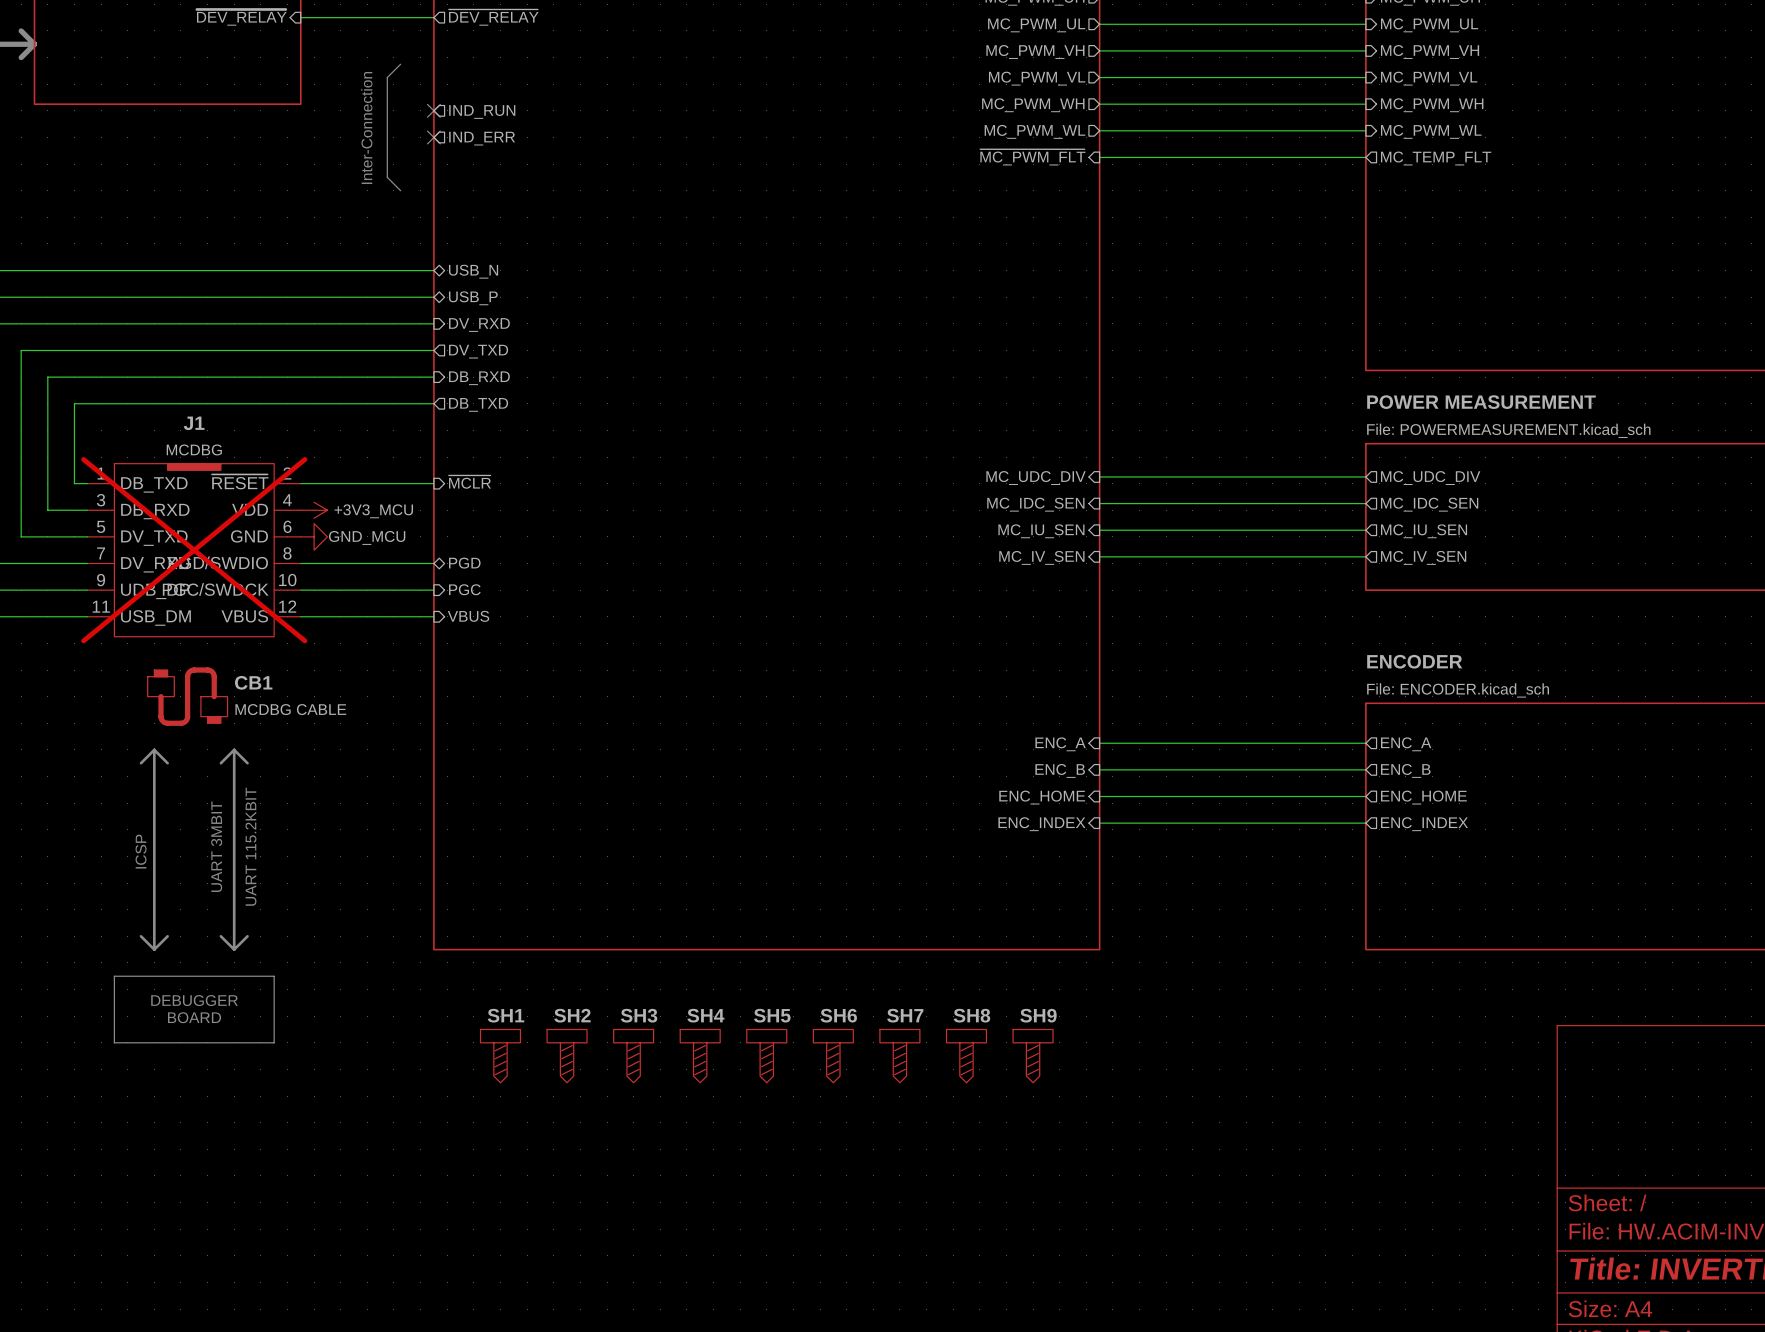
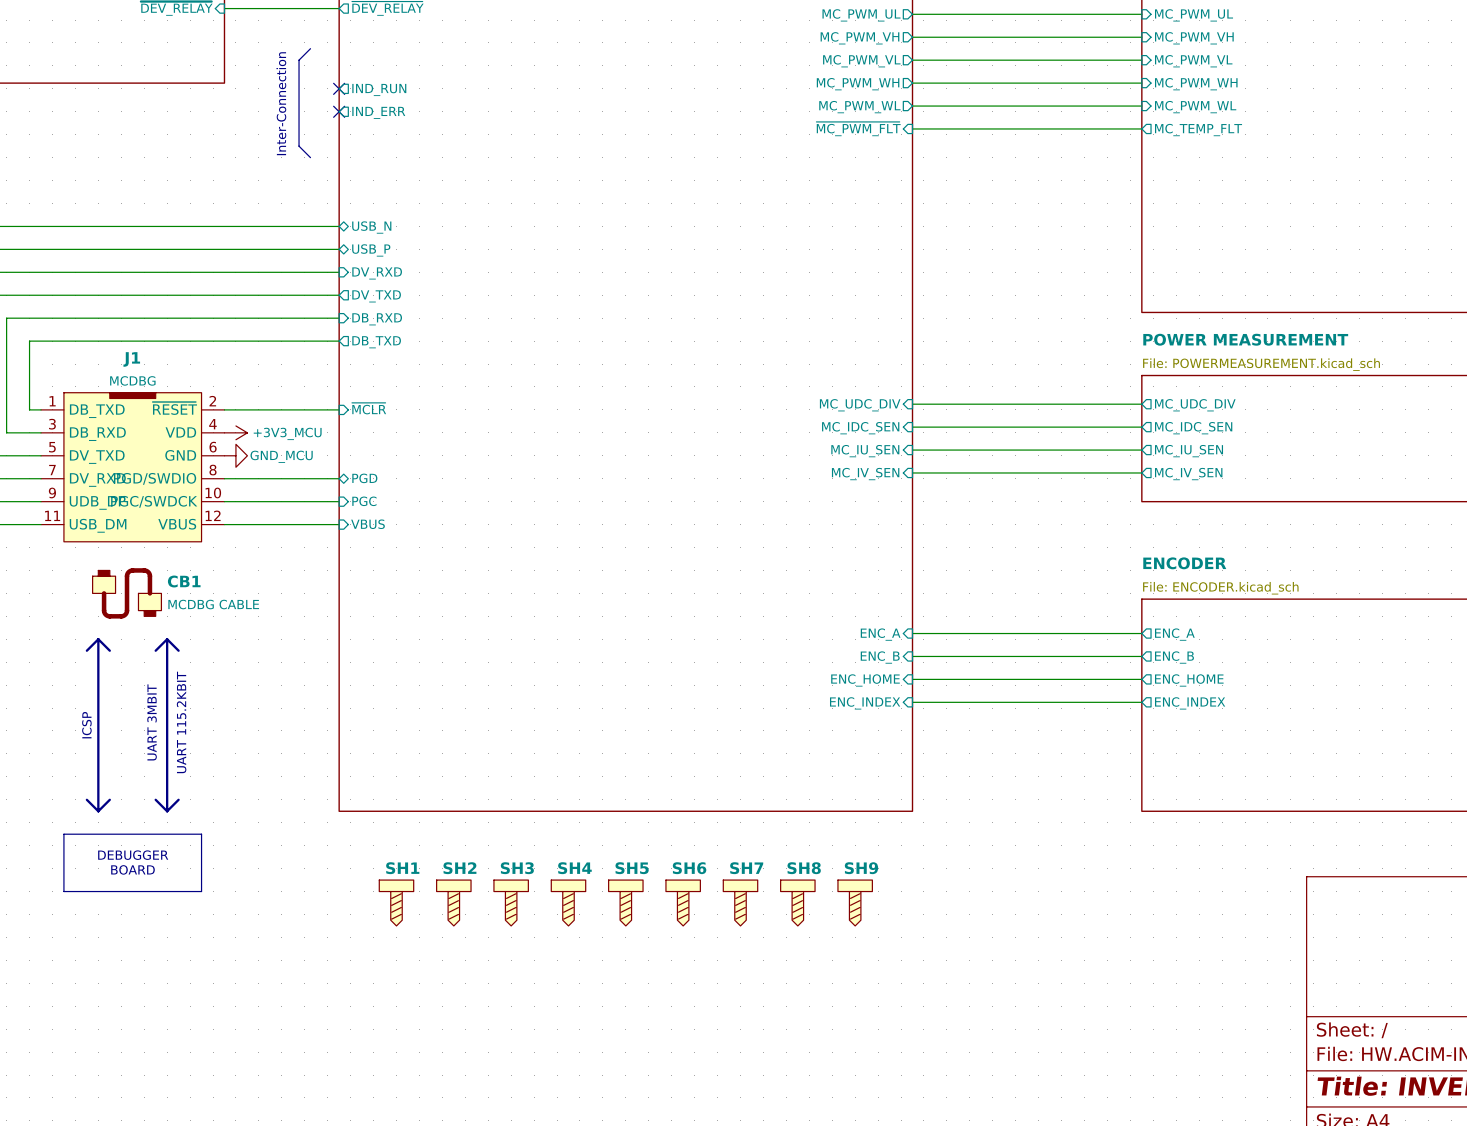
J1 do-not-place cross: (194, 550) -> none

